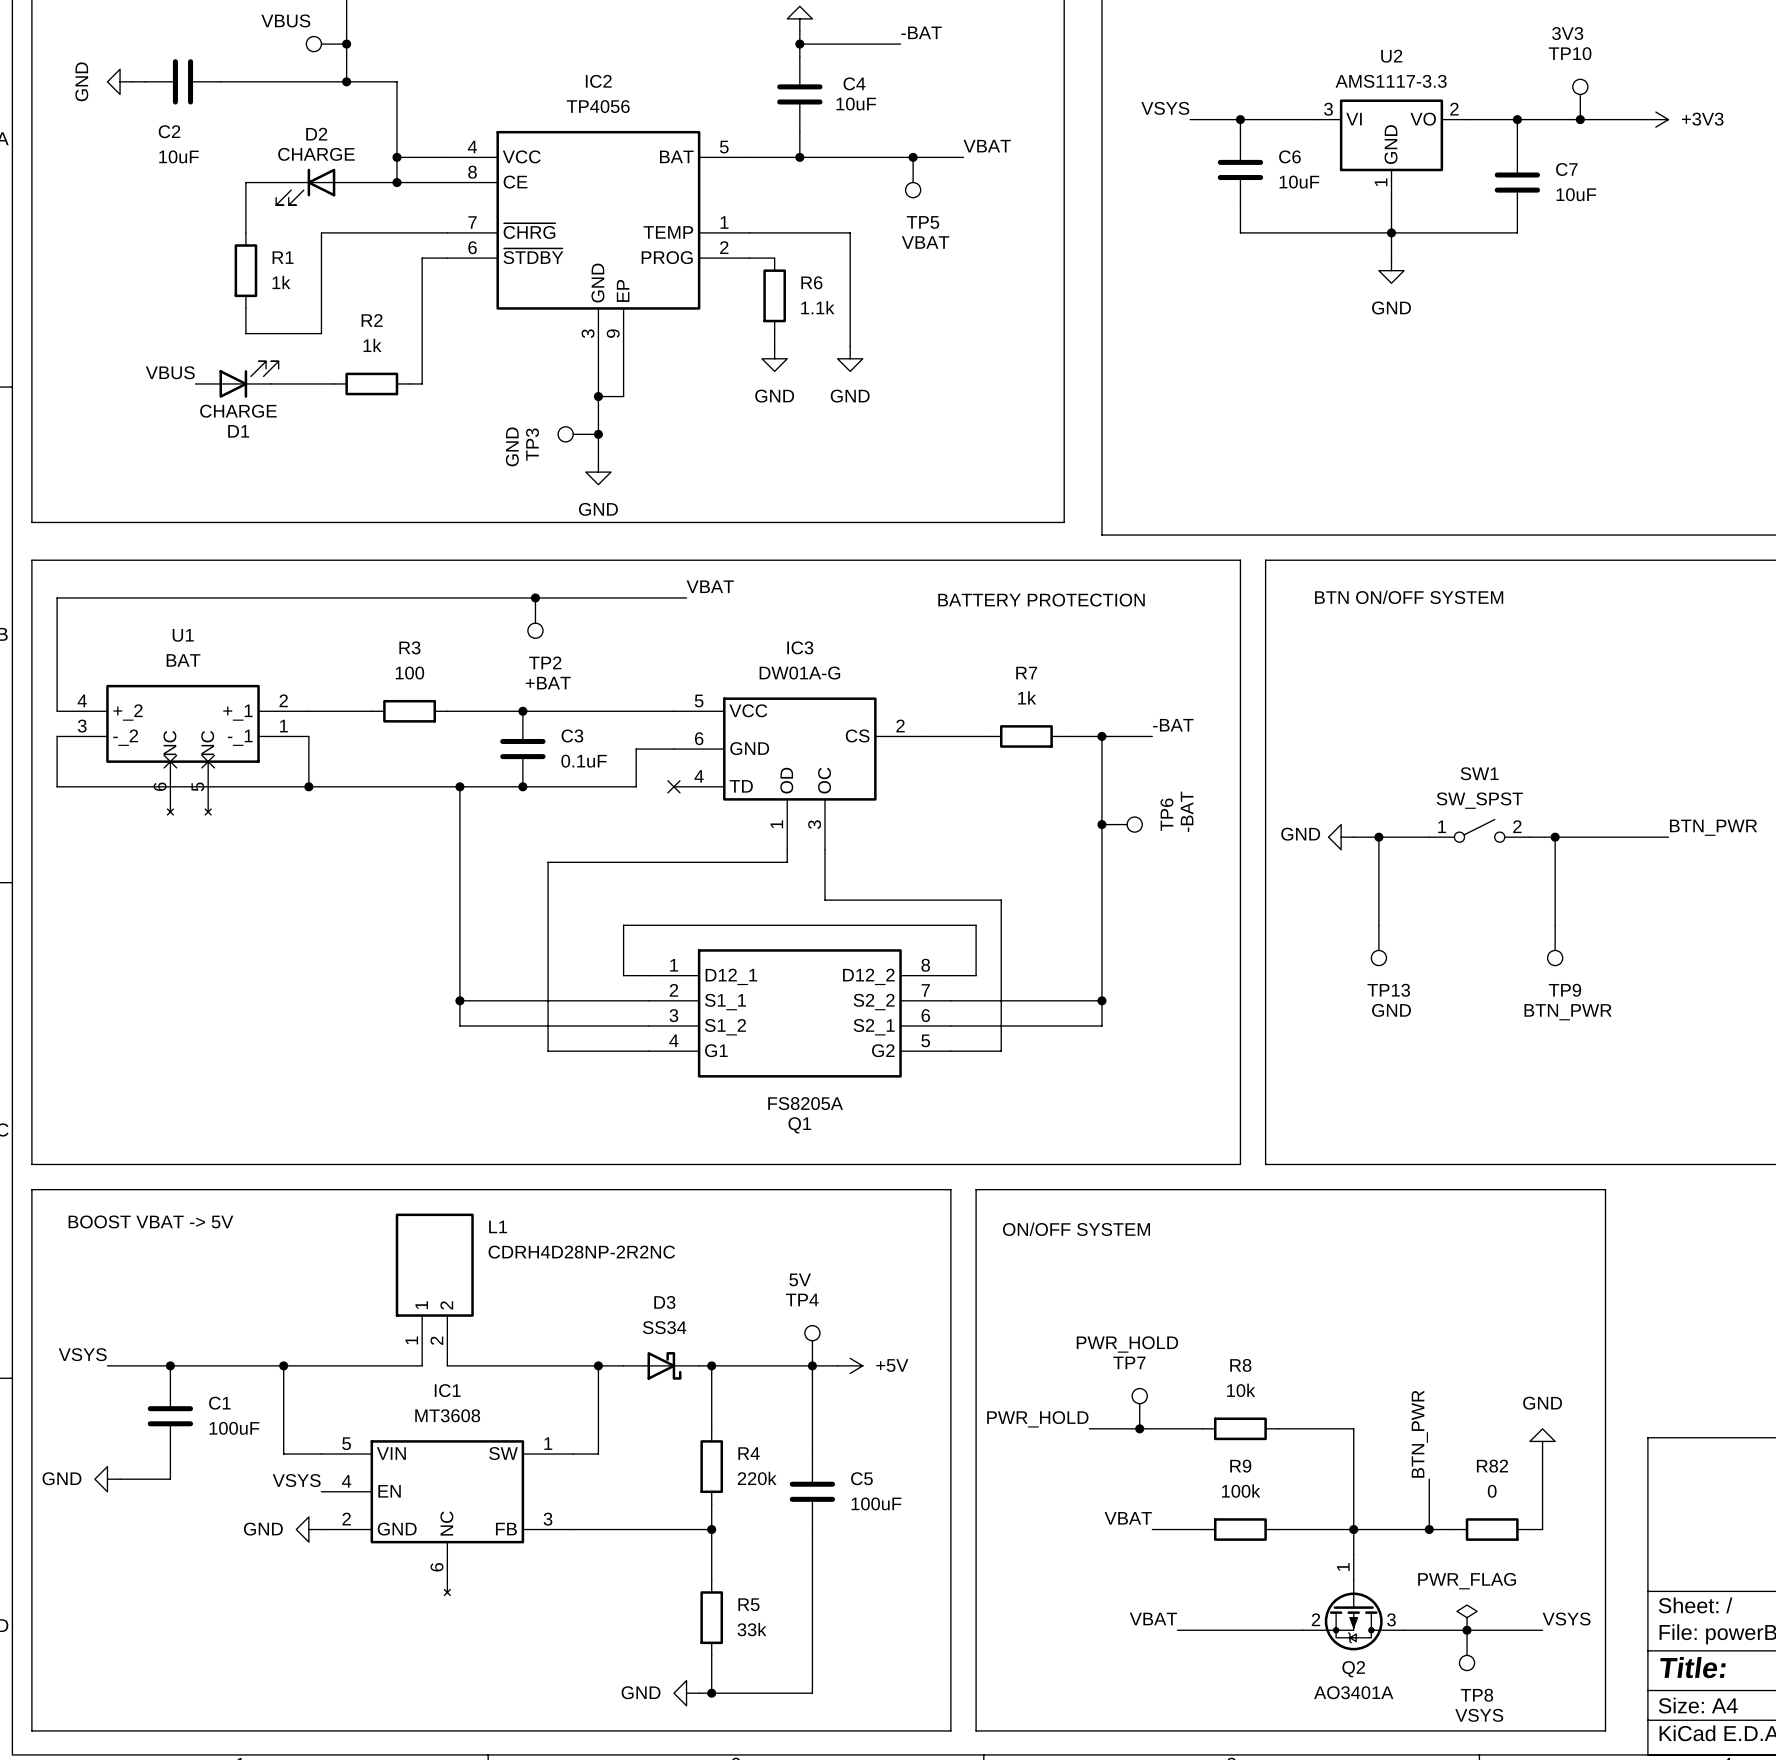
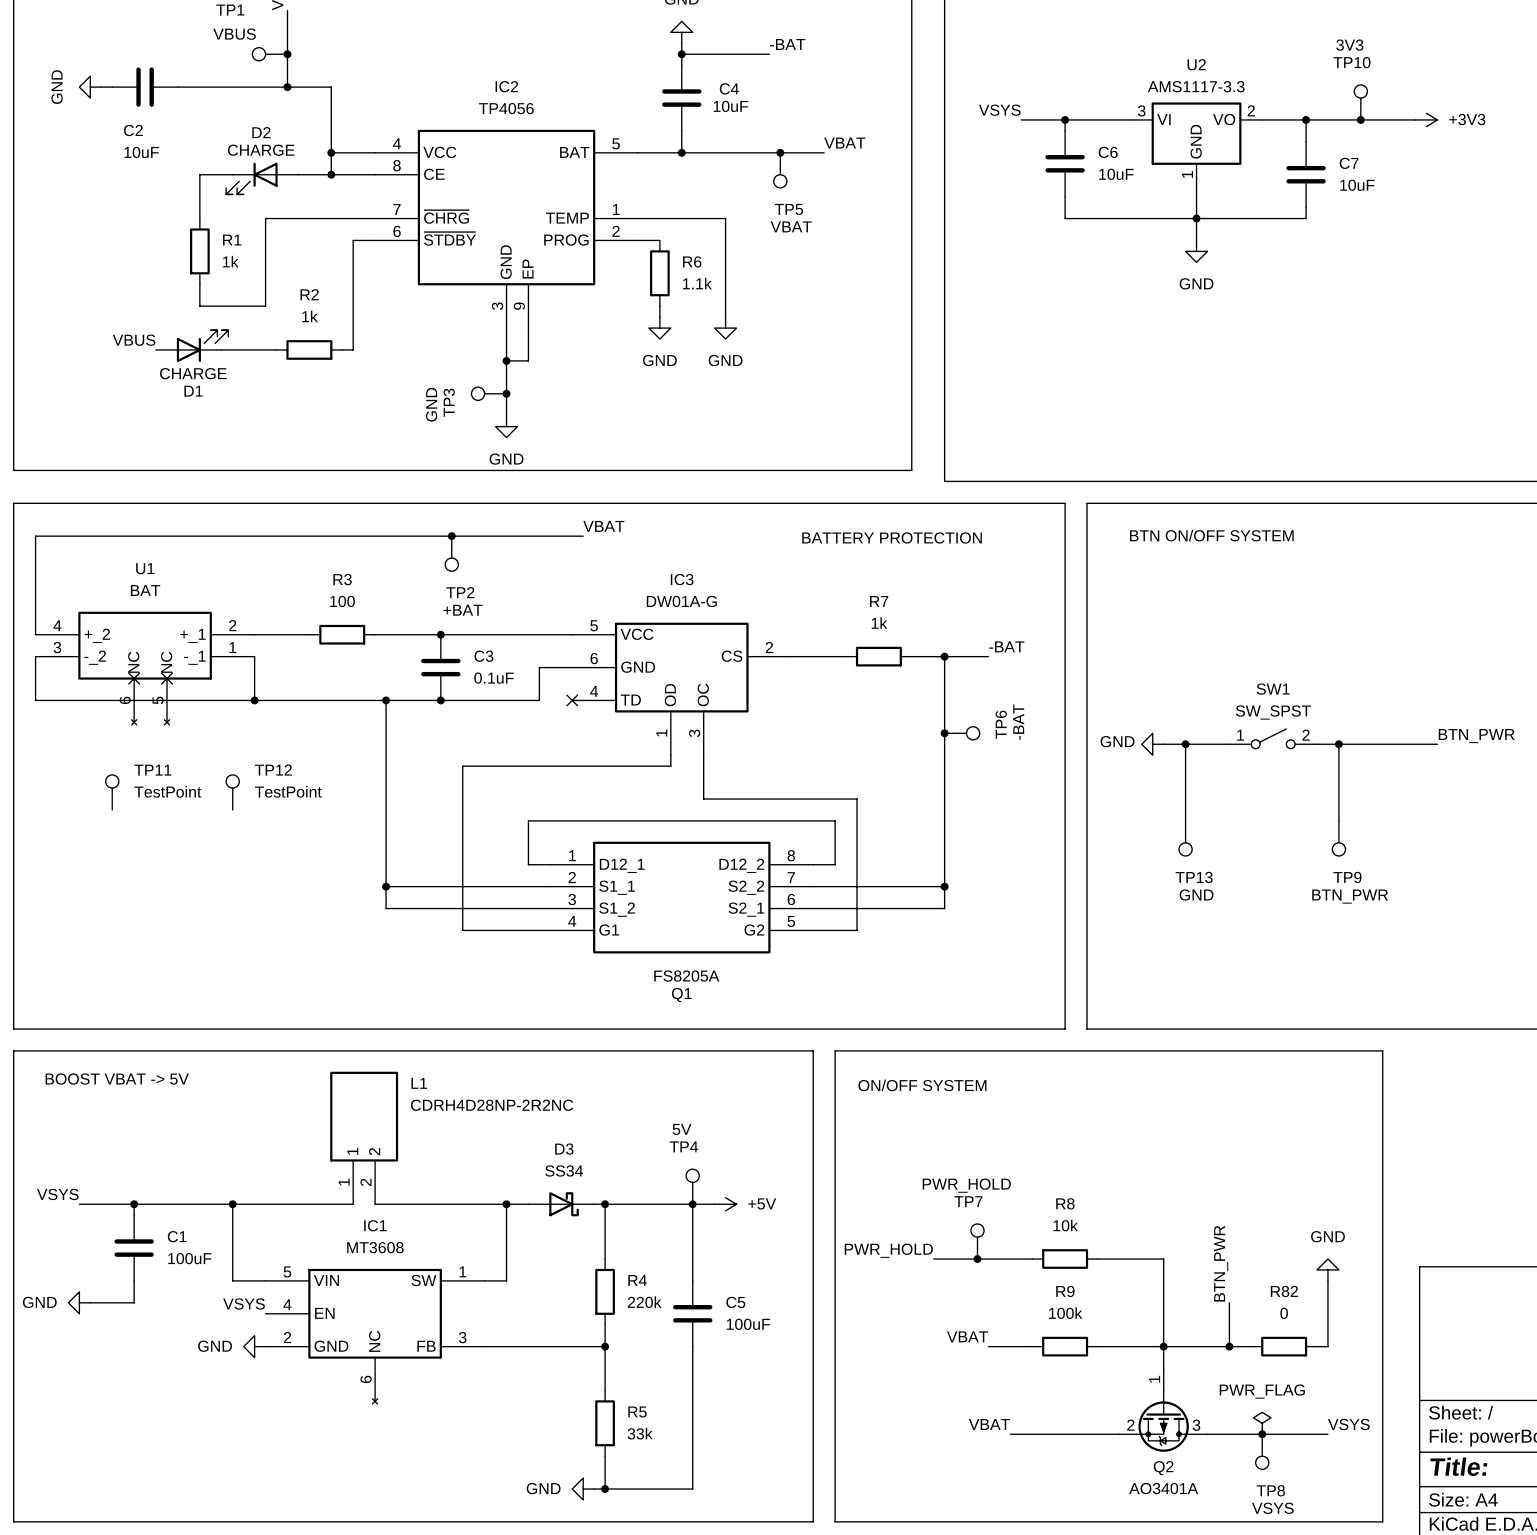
TP11: none -> TestPoint (112, 792)
TP12: none -> TestPoint (232, 792)

